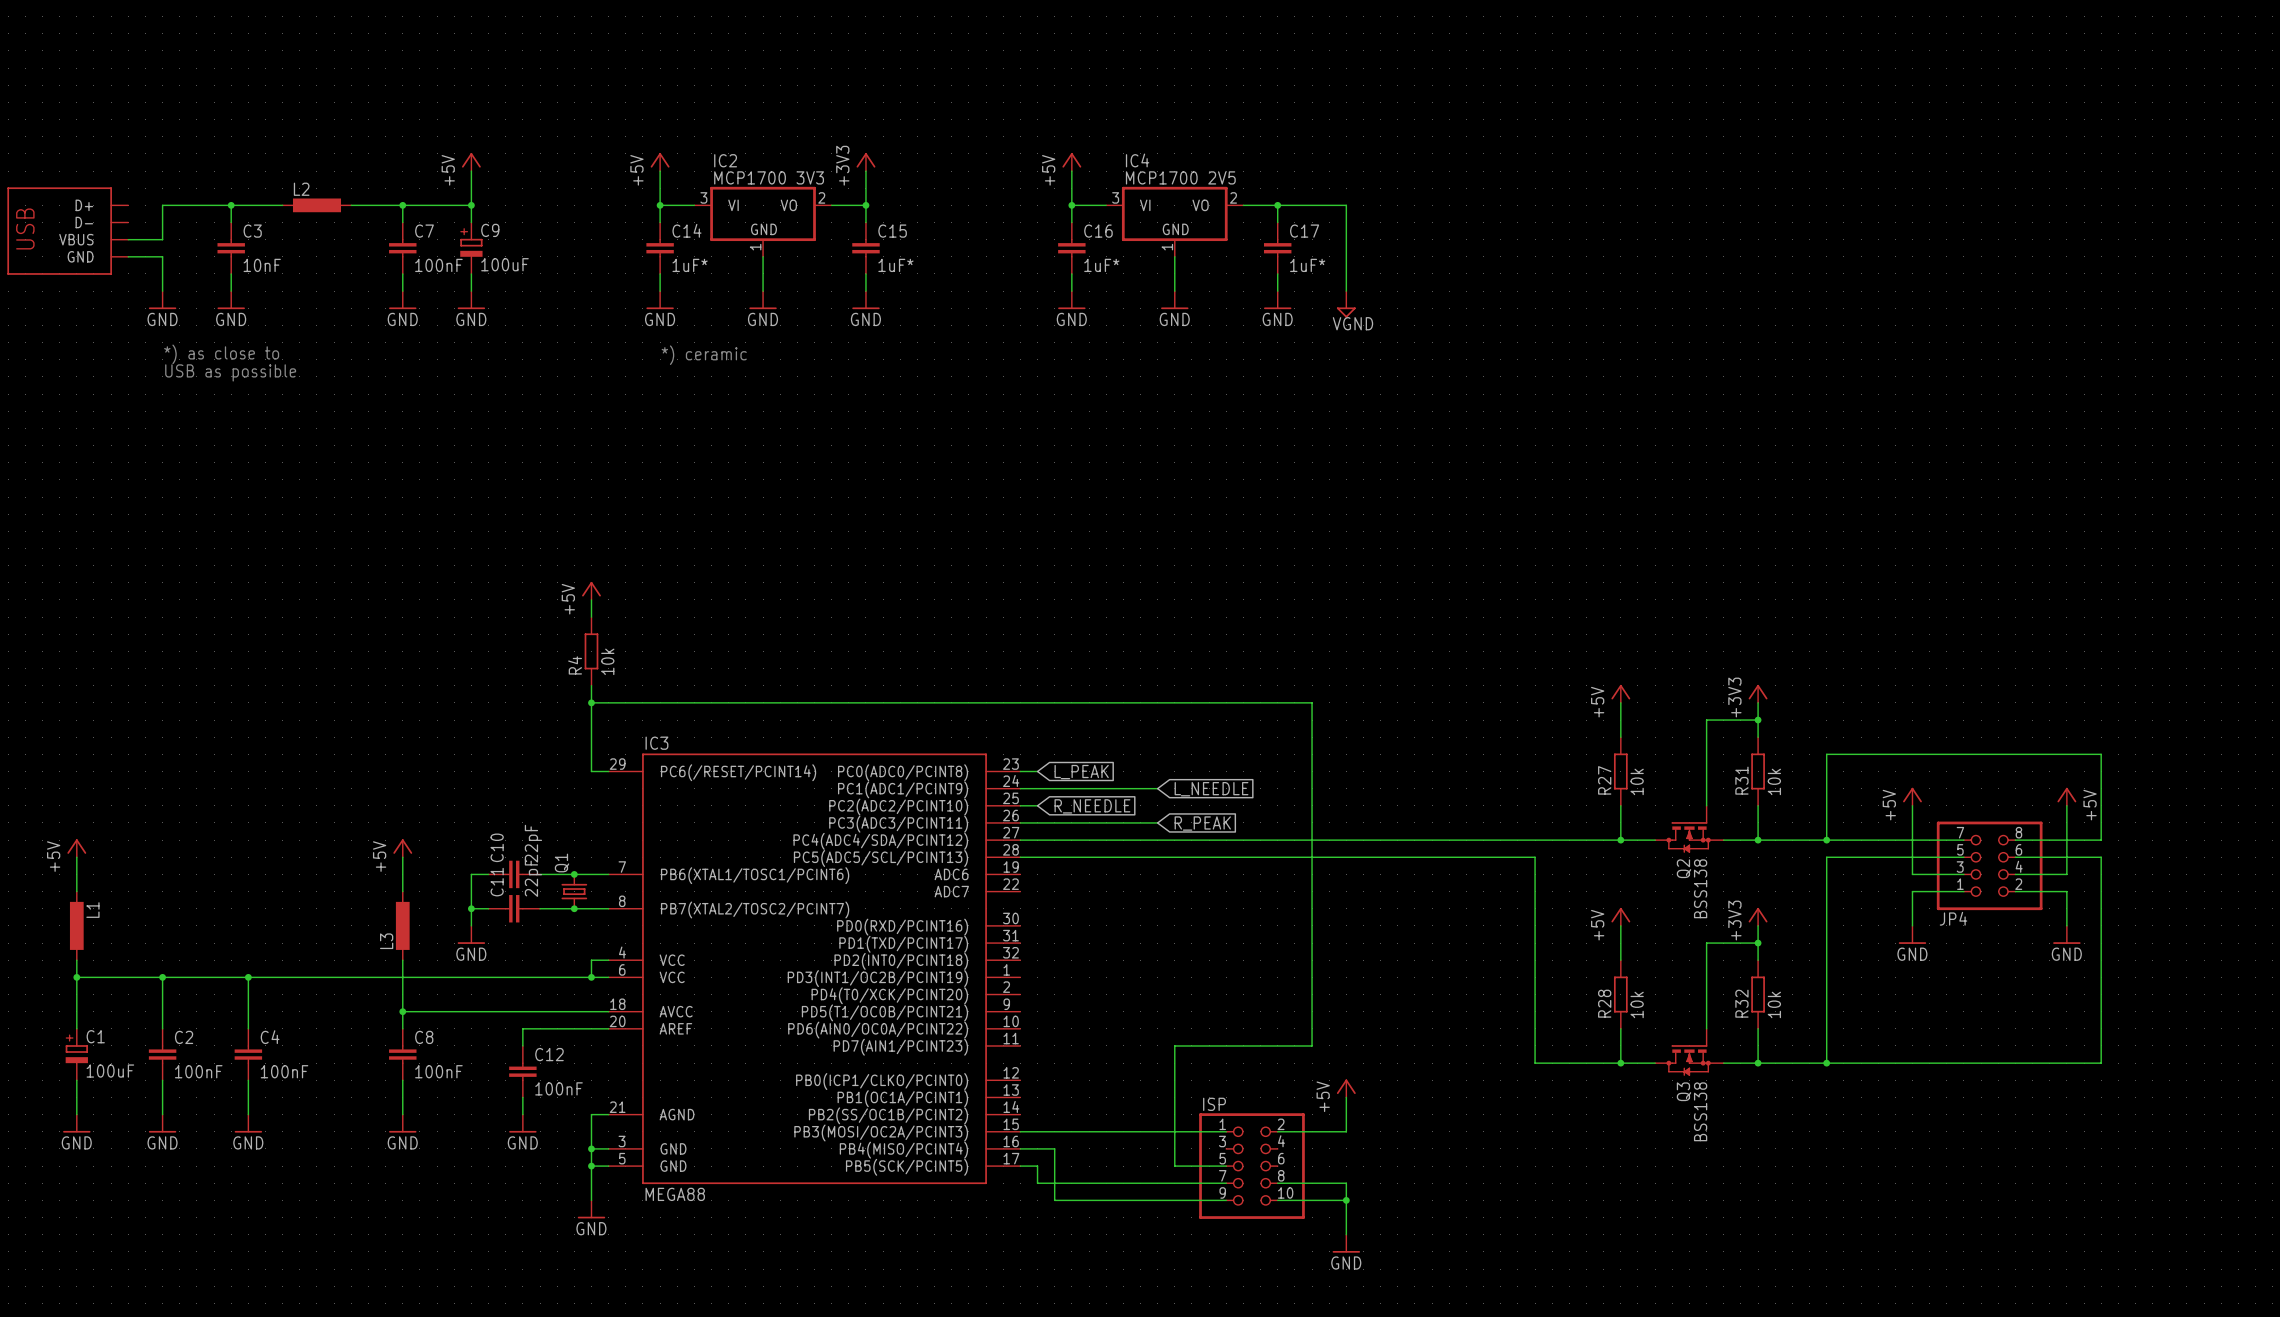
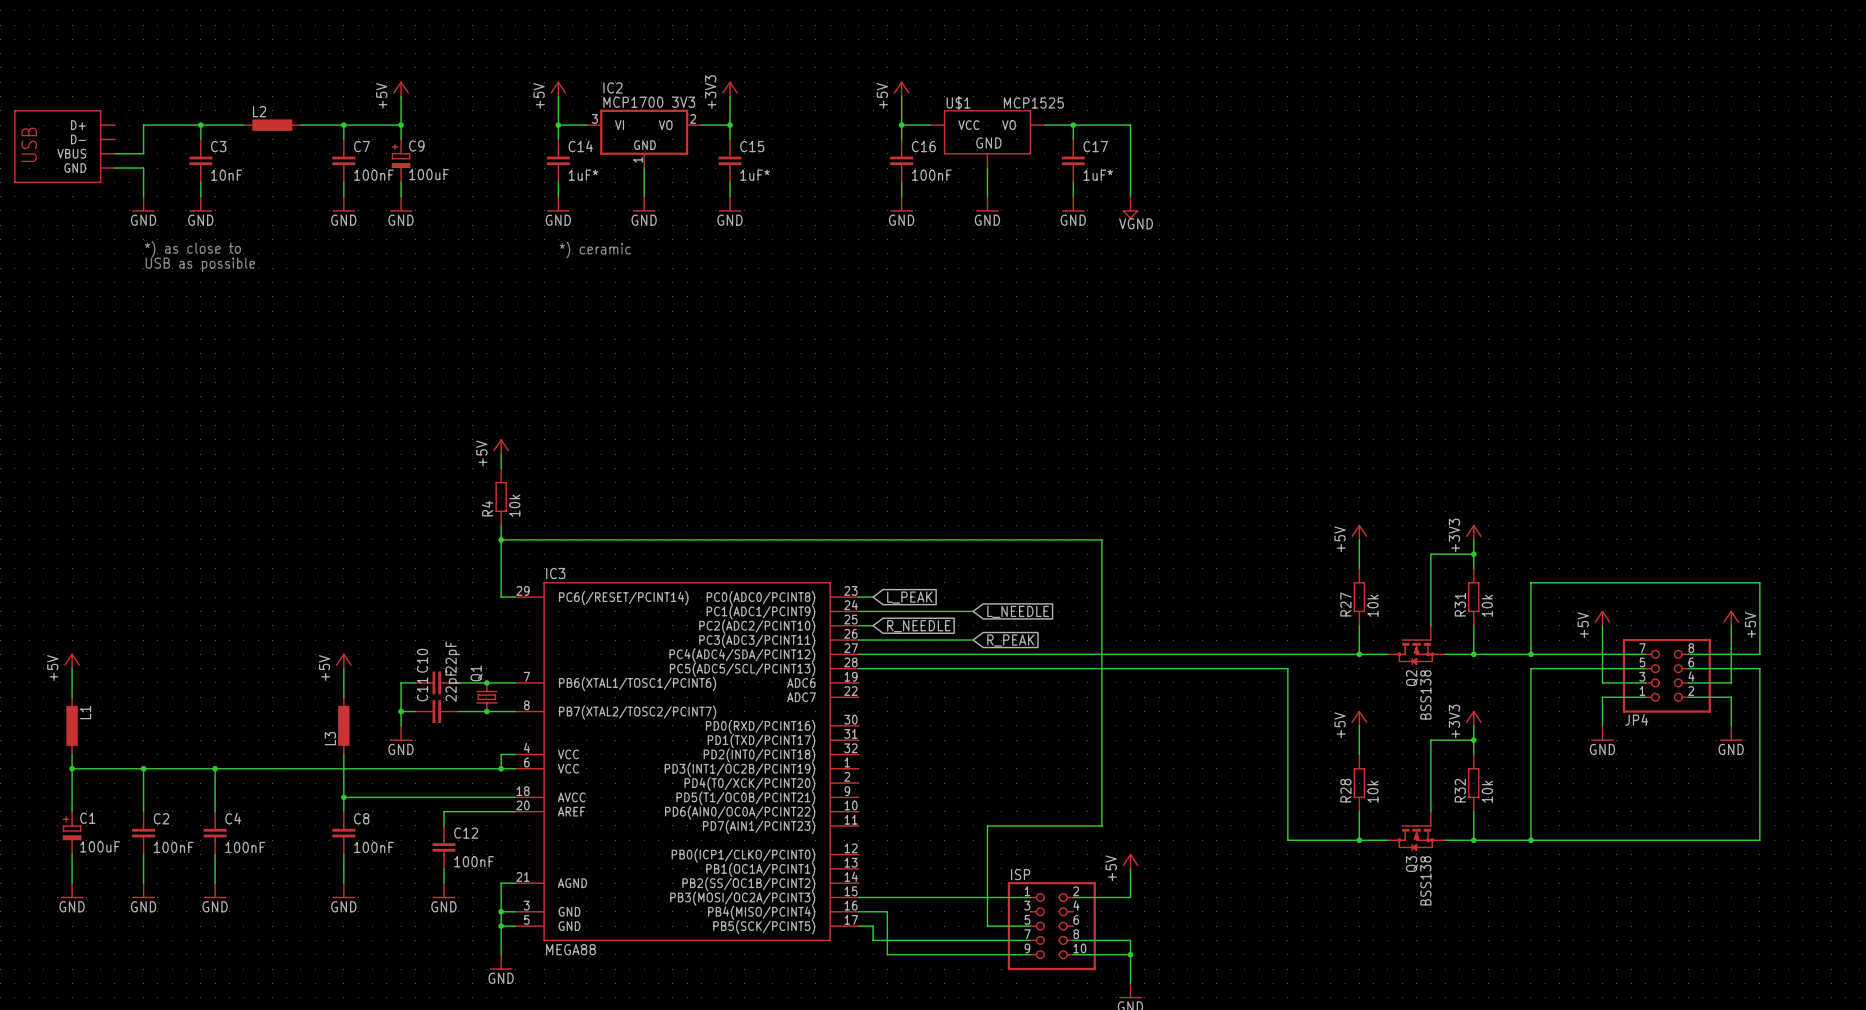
IC4: MCP1700 2V5 (1174, 221) -> none
U$1: none -> MCP1525 (987, 139)
C16 value: 1uF* (1101, 265) -> 100nF (931, 175)

